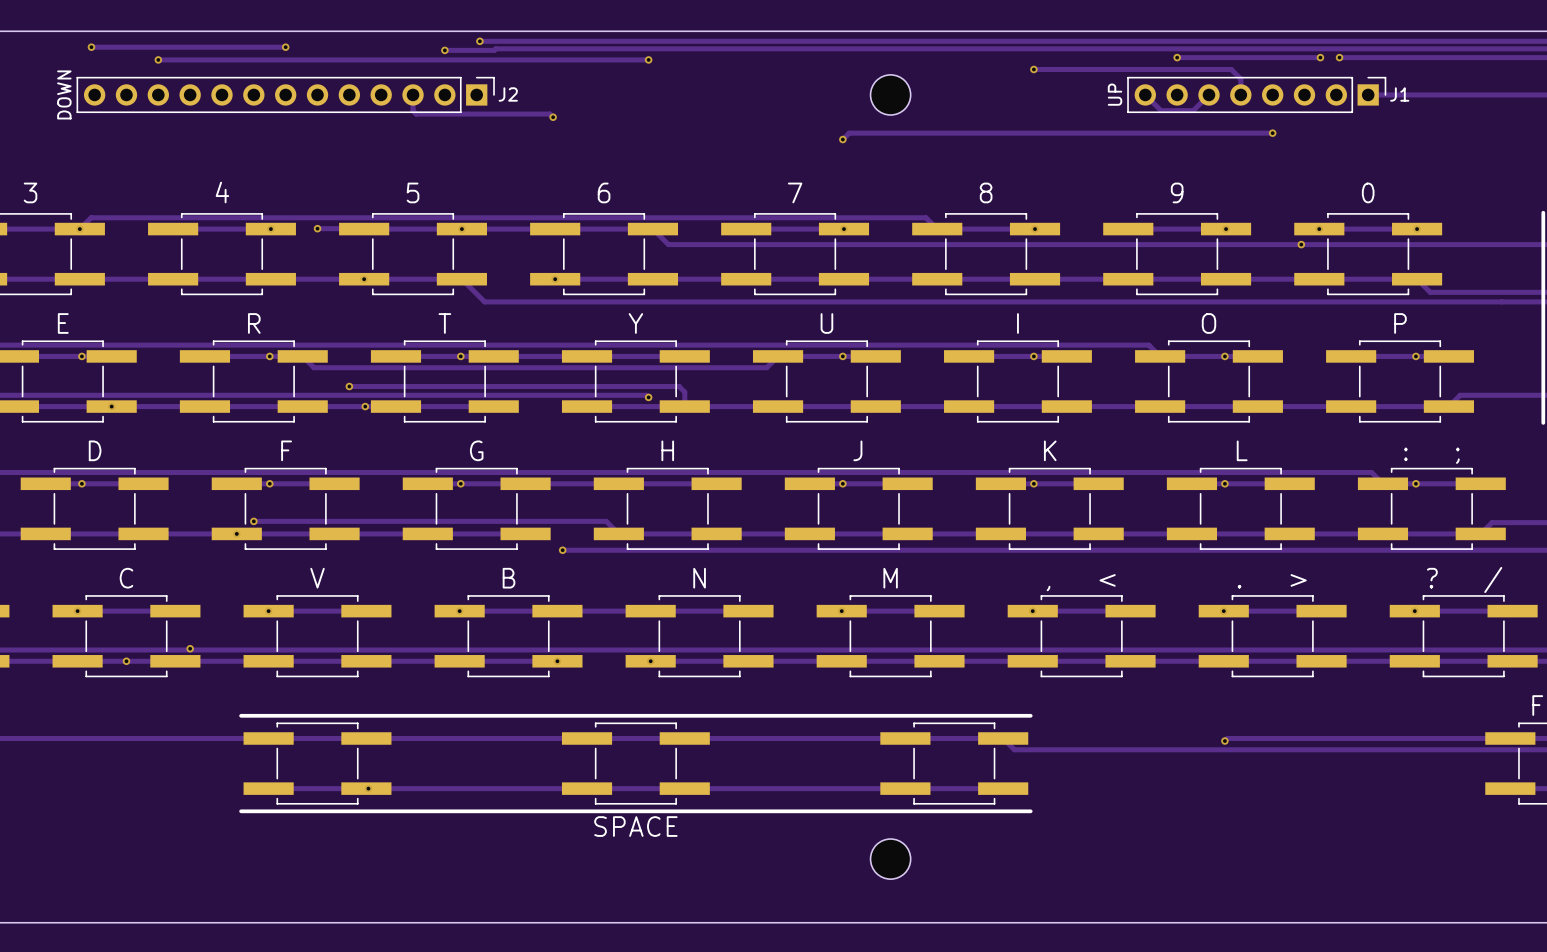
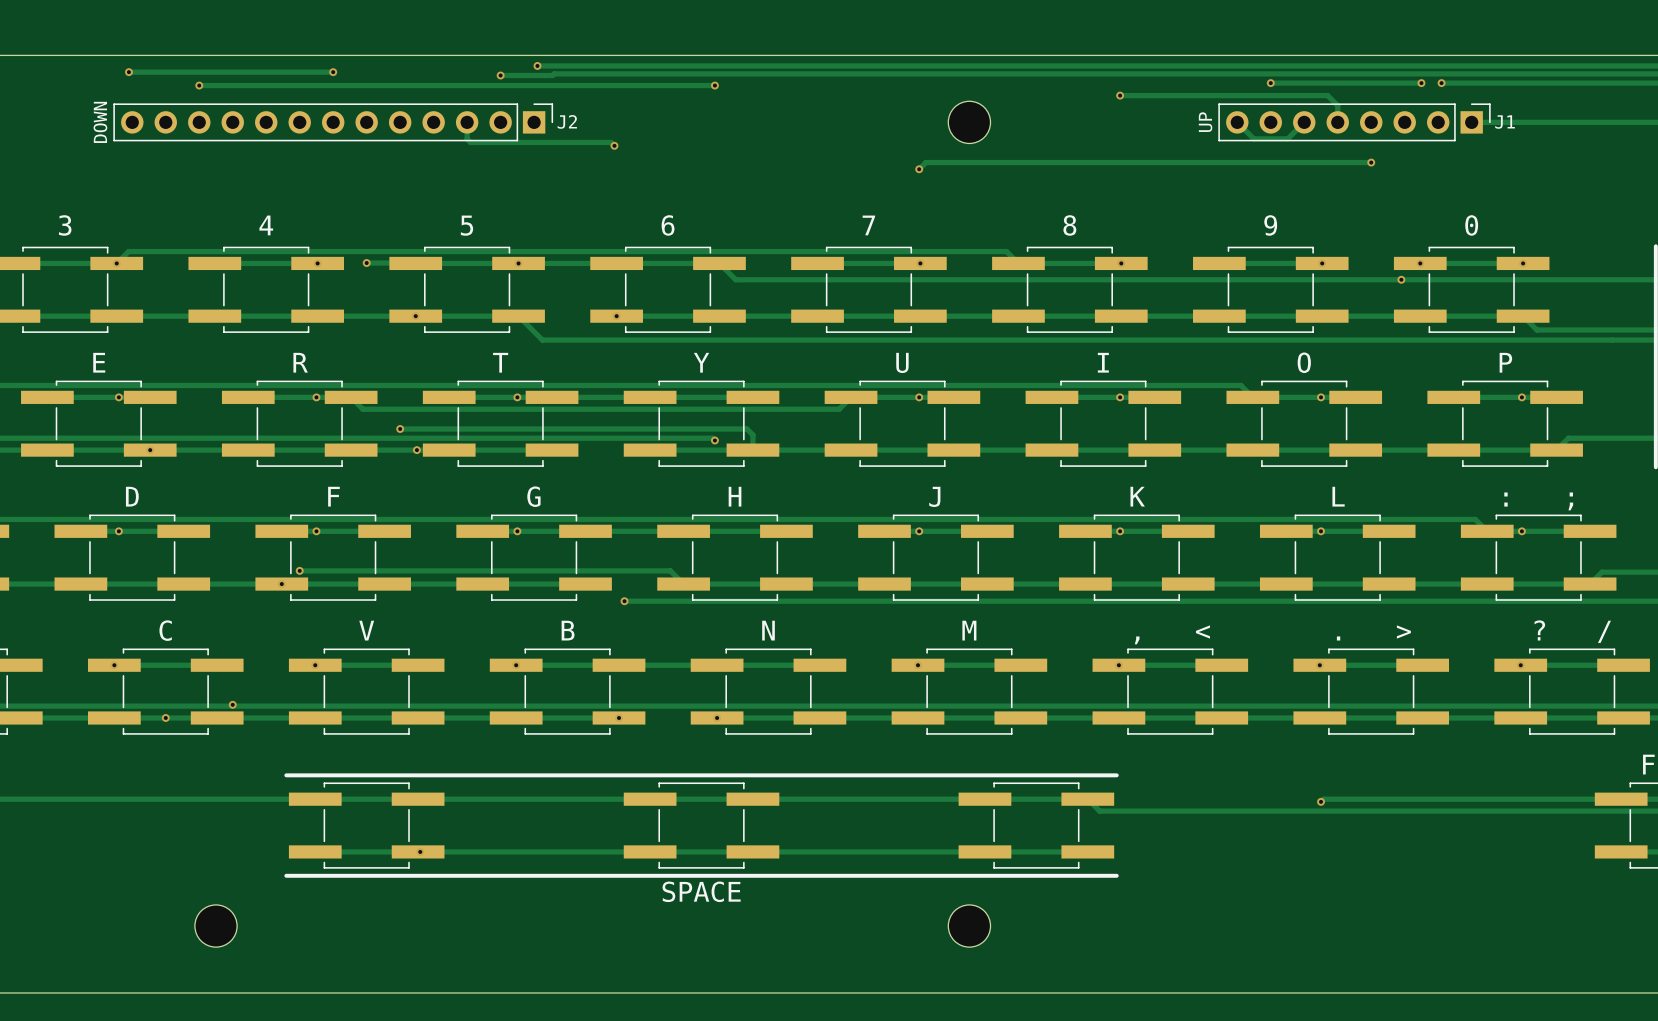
part: none -> (216, 926)

